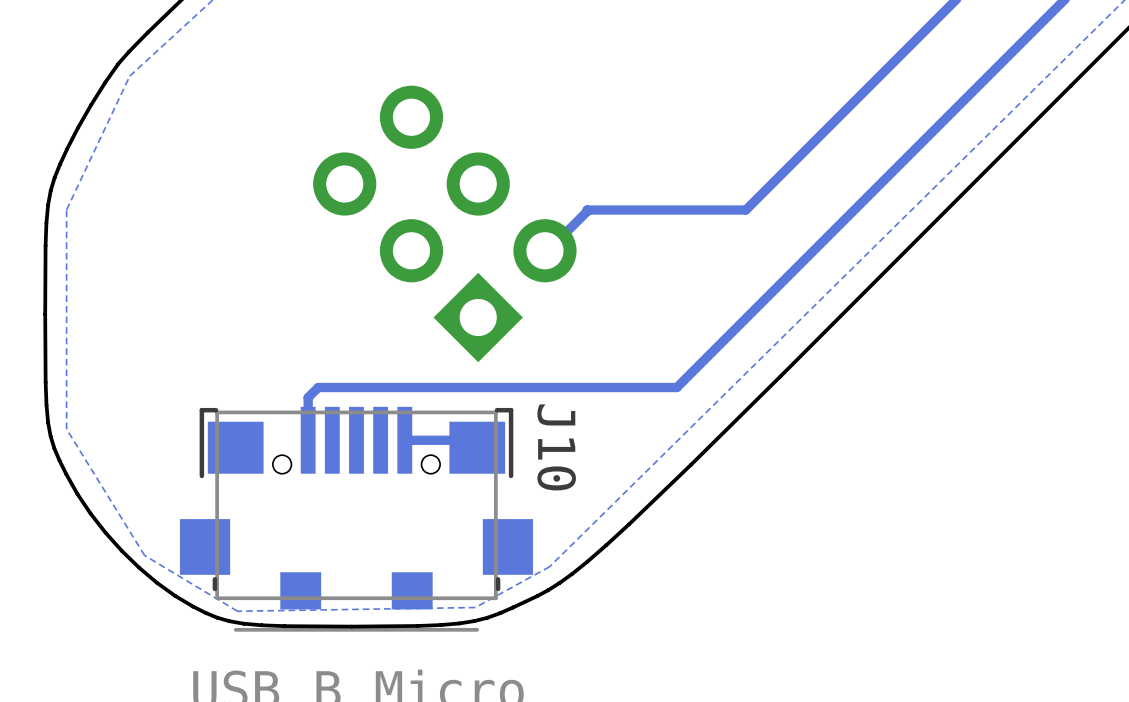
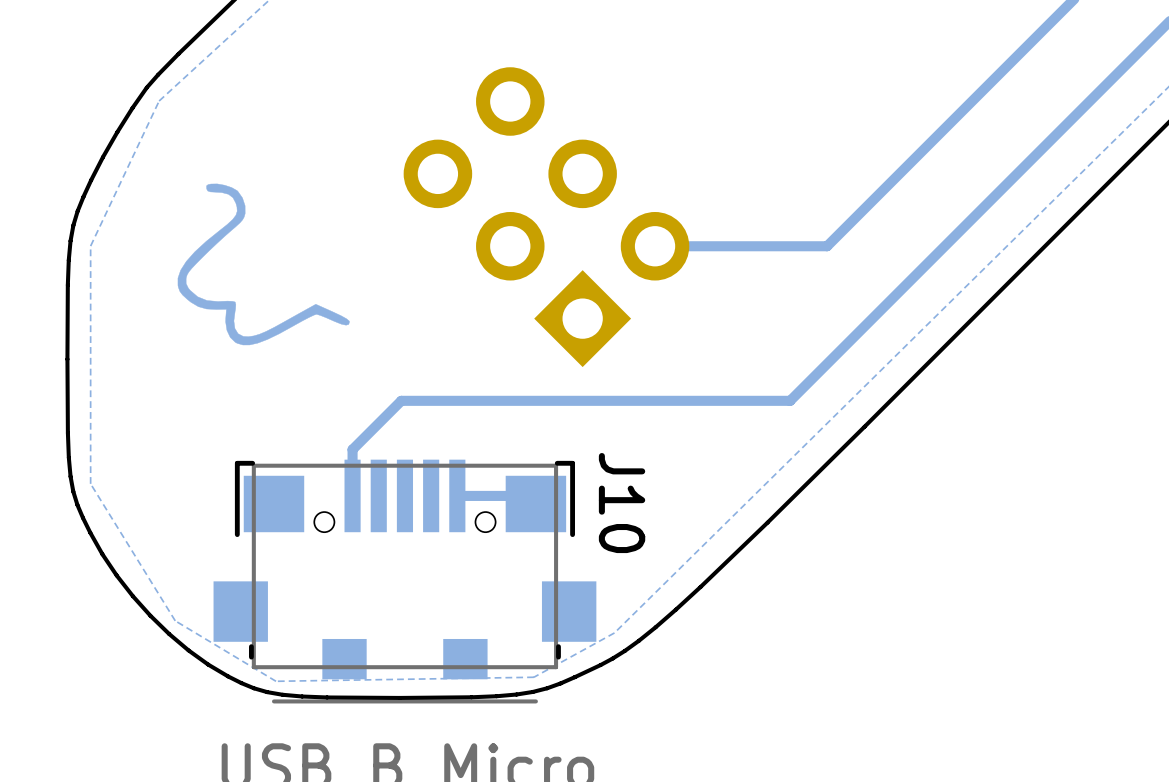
drawing: none -> [177, 183, 350, 346]
bottom track: (587, 210) (550, 248) -> none
part position: (444, 223) -> (546, 217)
bottom track: (711, 352) (676, 387) (318, 387) -> (790, 400) (401, 400) (363, 438)

